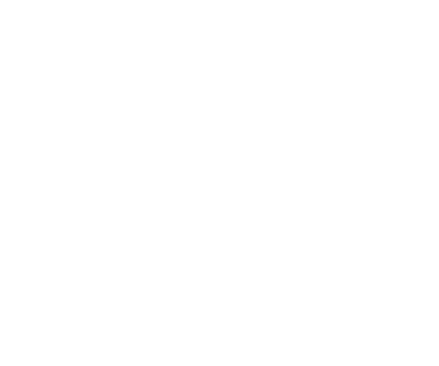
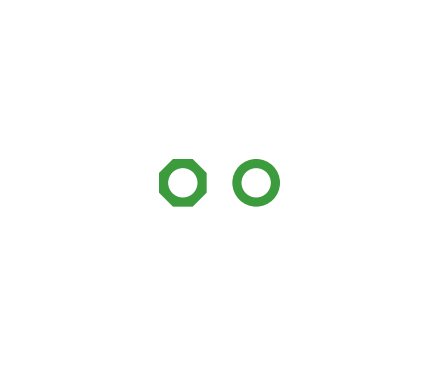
part: none -> (219, 182)

